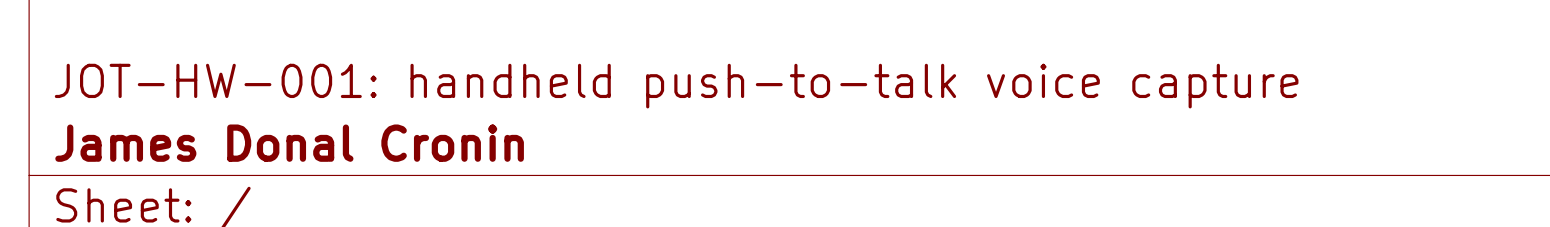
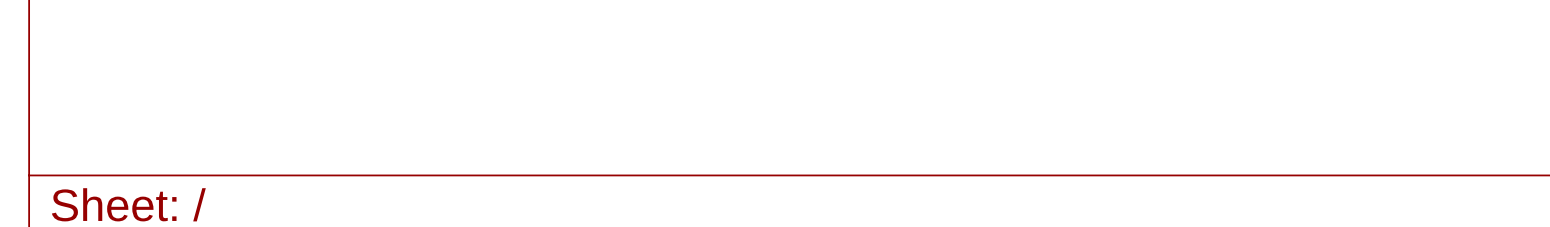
title block: JOT-HW-001: handheld push-to-talk voice capture (676, 86) -> none
title block: James Donal Cronin (289, 143) -> none

